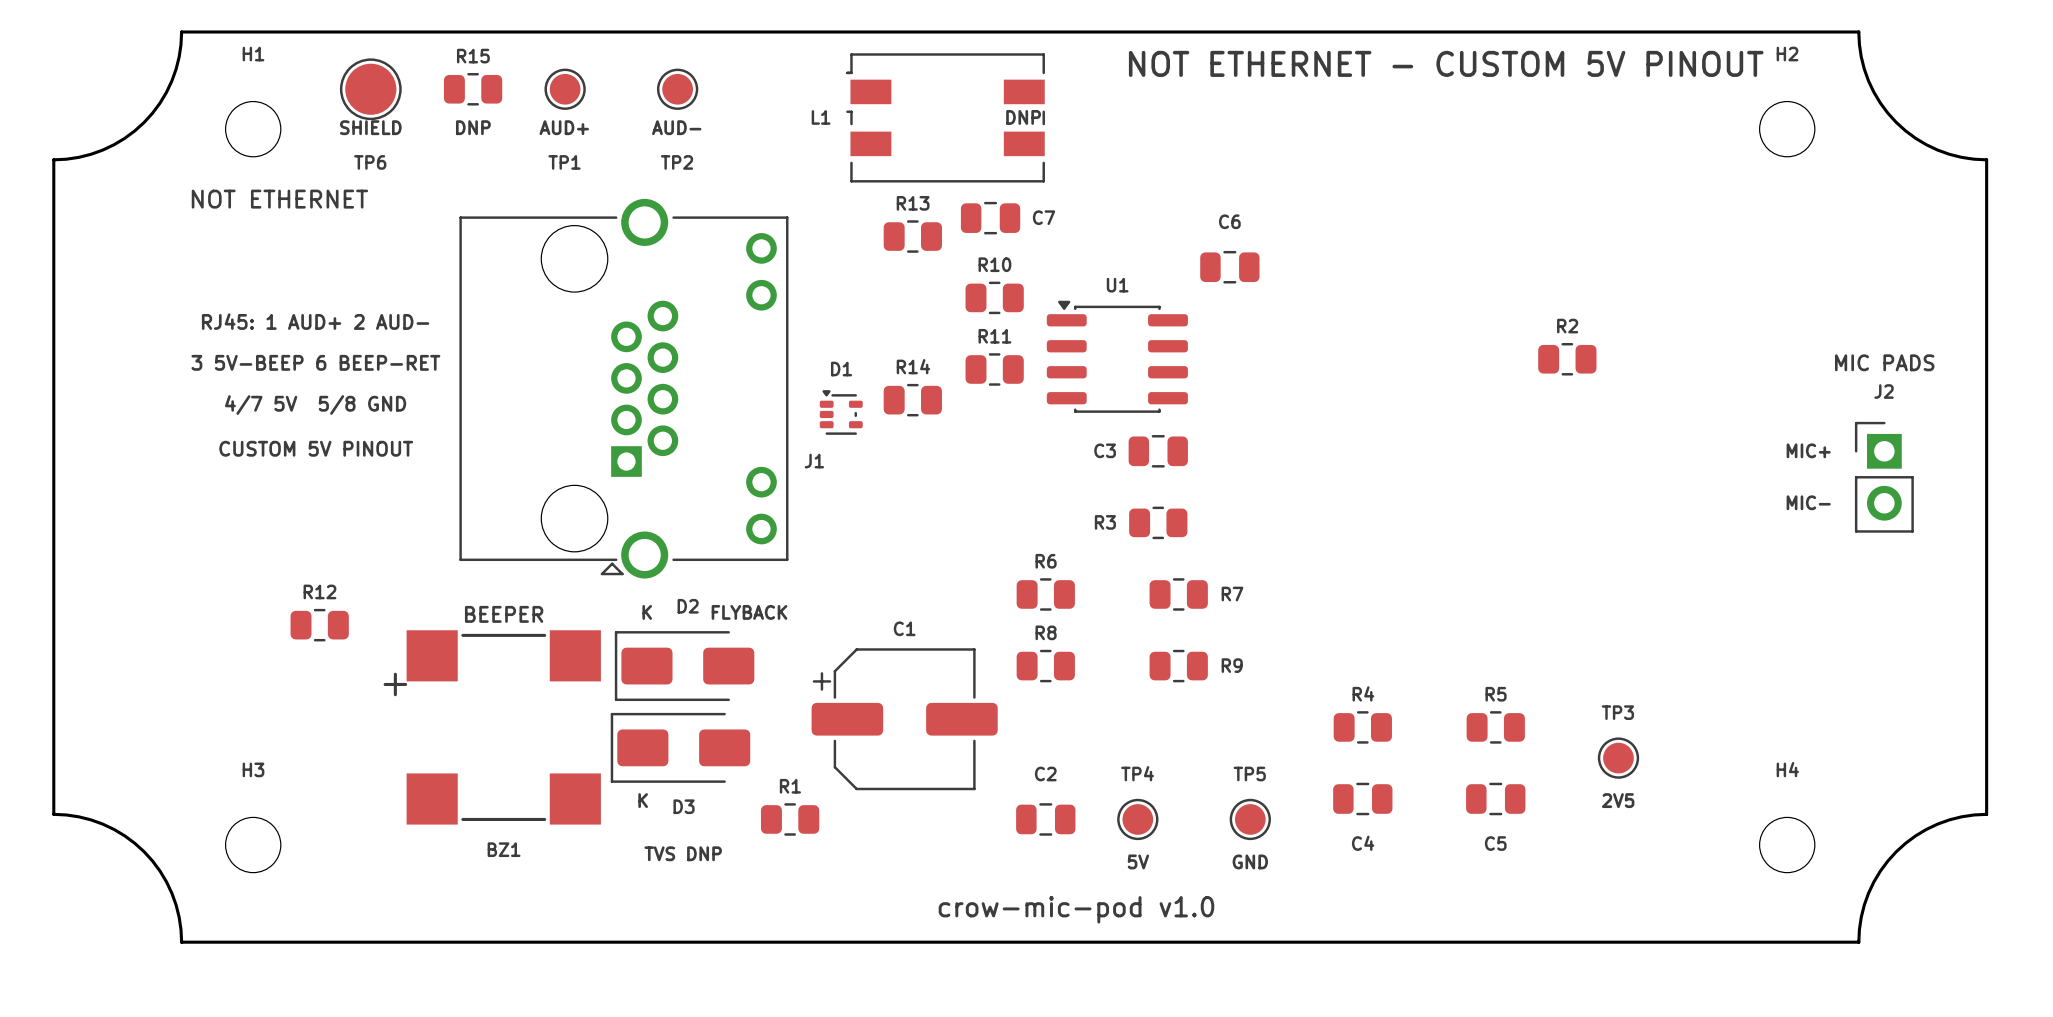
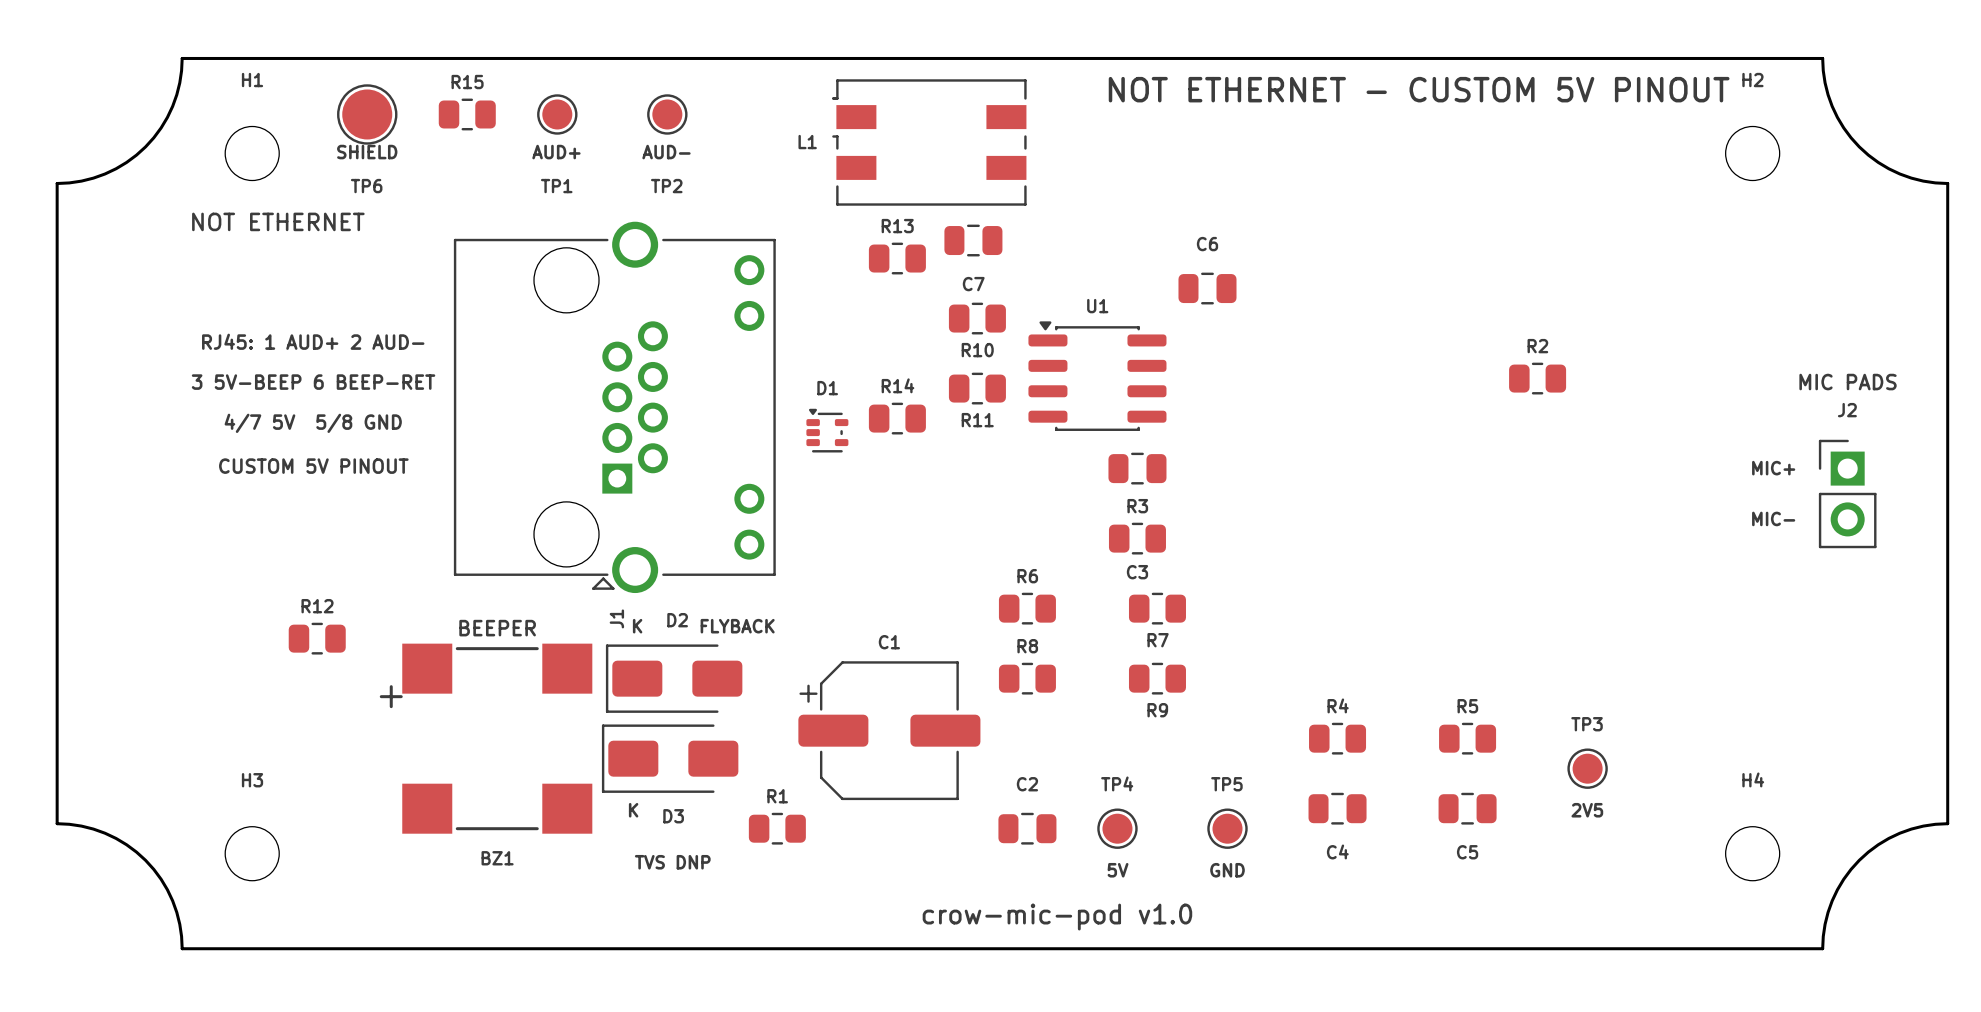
text: DNP (1023, 117) -> none
text: DNP (473, 127) -> none
C7 name position: C7 (1044, 217) -> C7 (973, 284)
R10 name position: R10 (994, 264) -> R10 (977, 350)
R11 name position: R11 (994, 336) -> R11 (977, 420)
C3 name position: C3 (1105, 450) -> C3 (1137, 572)
J1 name rotation: 0° (814, 461) -> 90° counterclockwise (616, 618)
J1 name position: J1 (814, 461) -> J1 (616, 618)
R3 name position: R3 (1105, 522) -> R3 (1137, 506)
R7 name position: R7 (1232, 594) -> R7 (1158, 640)
R9 name position: R9 (1232, 665) -> R9 (1157, 710)

